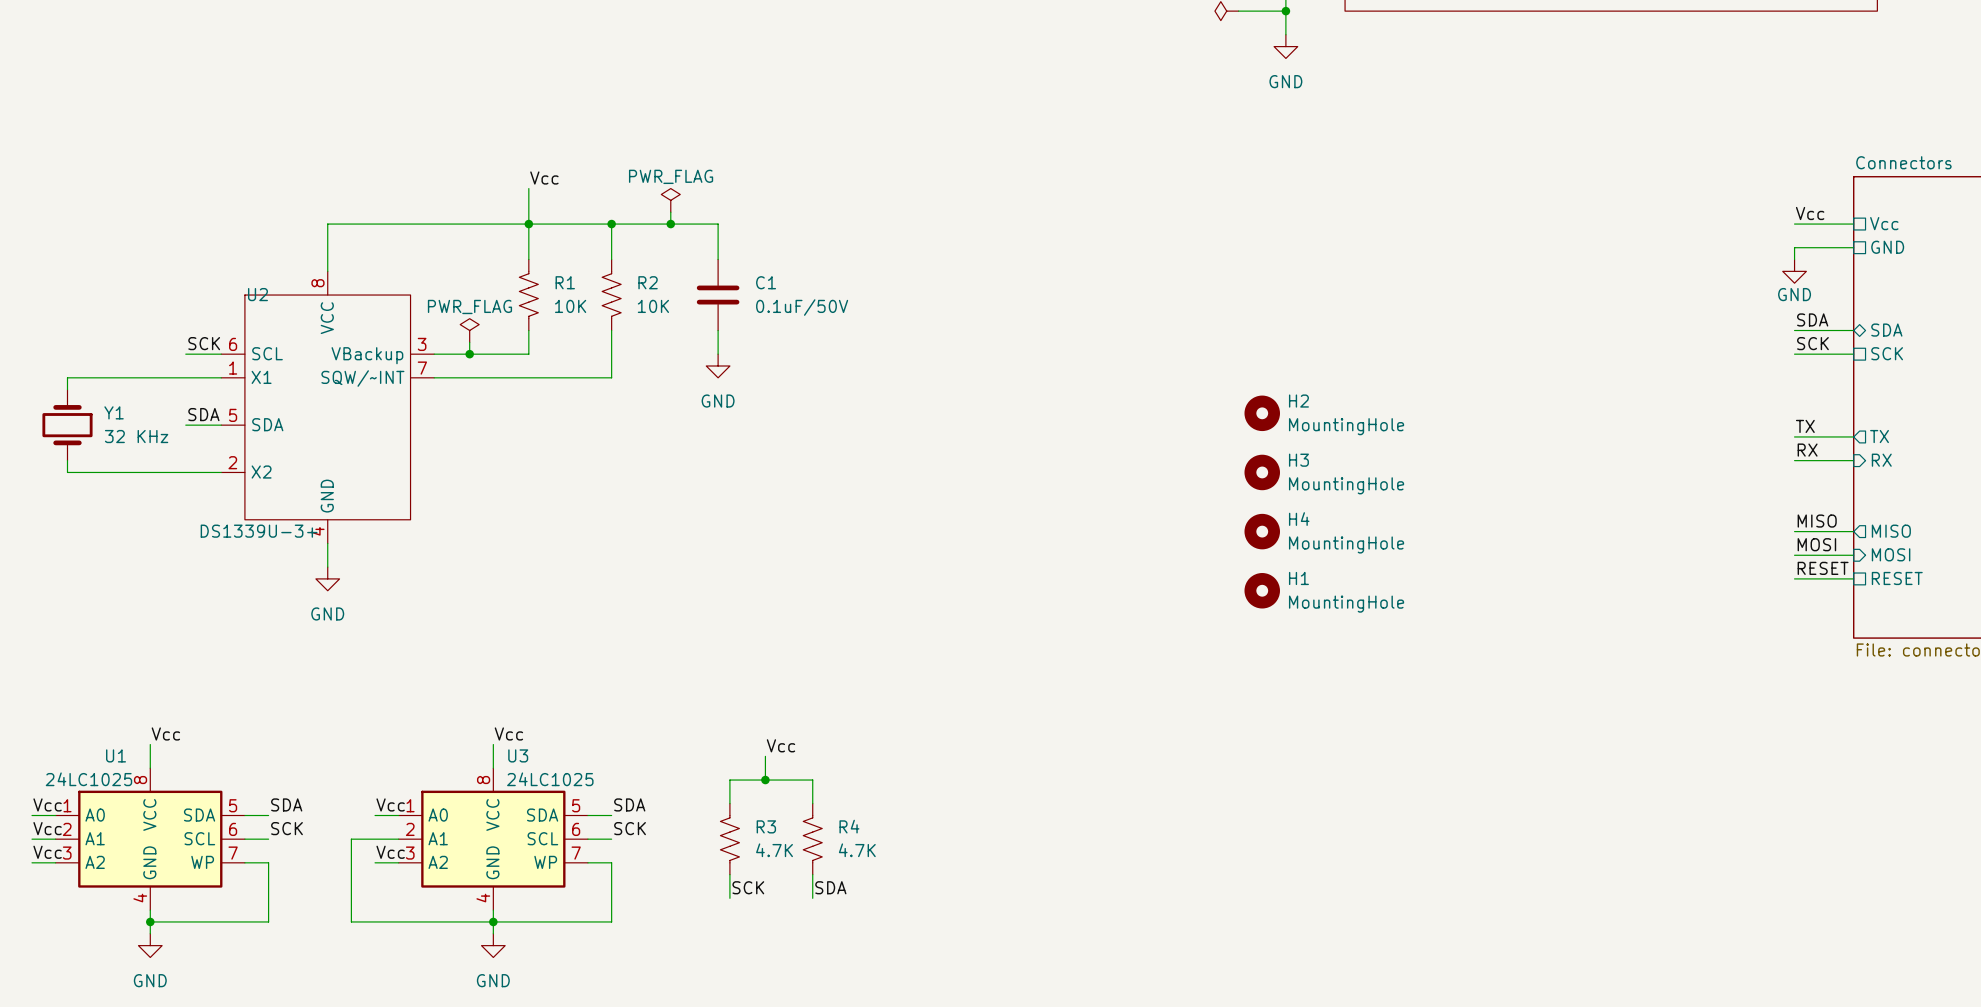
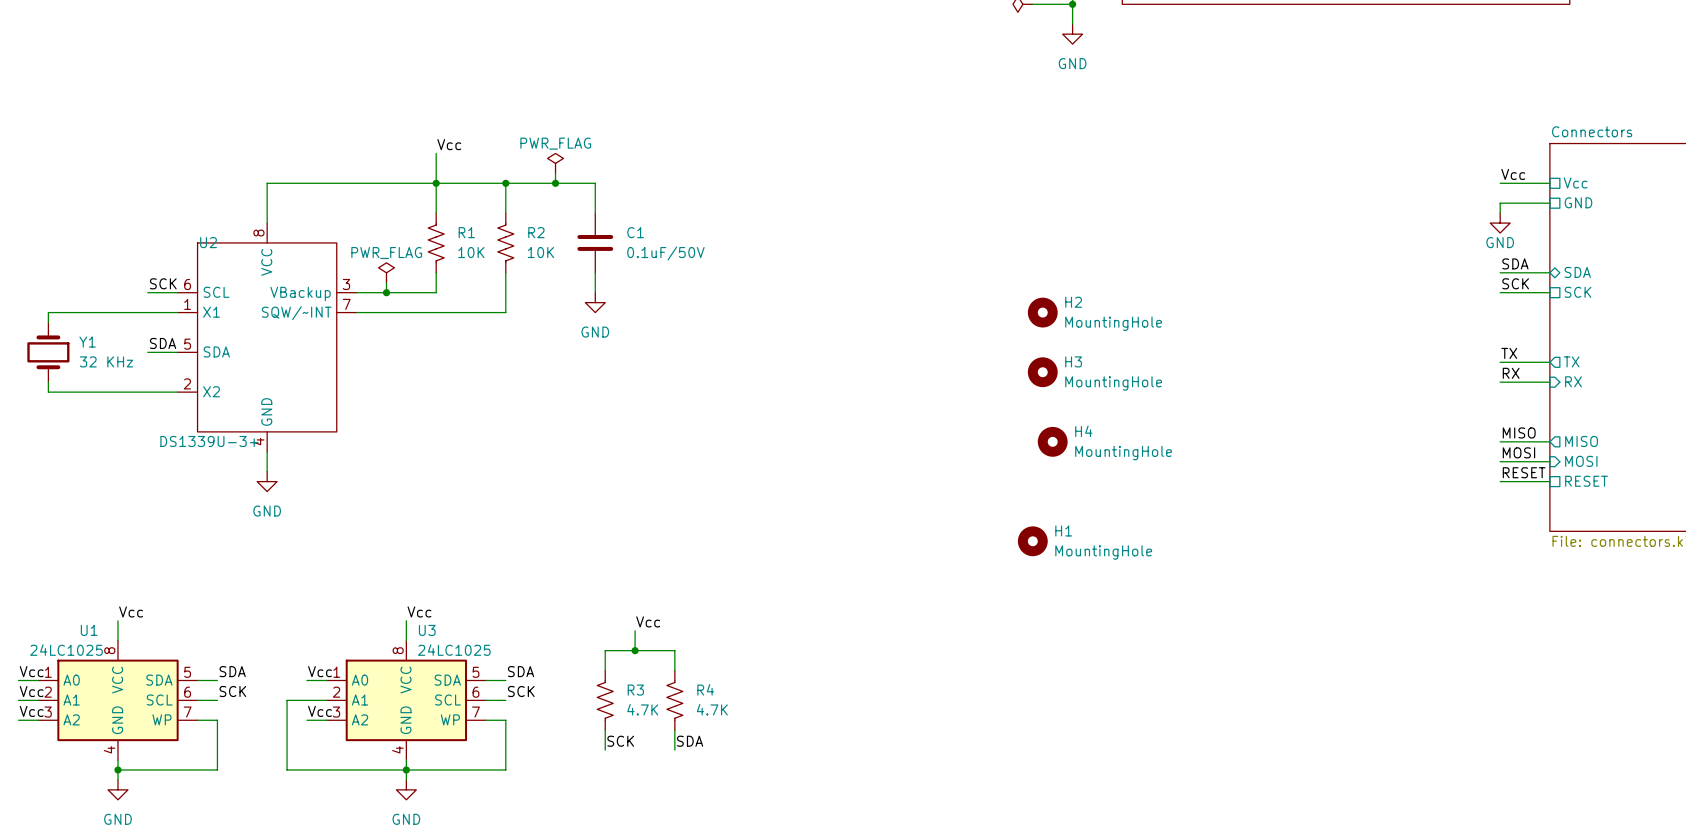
H2 position: (1262, 413) -> (1042, 312)
H3 position: (1262, 472) -> (1042, 372)
H1 position: (1262, 590) -> (1032, 541)

